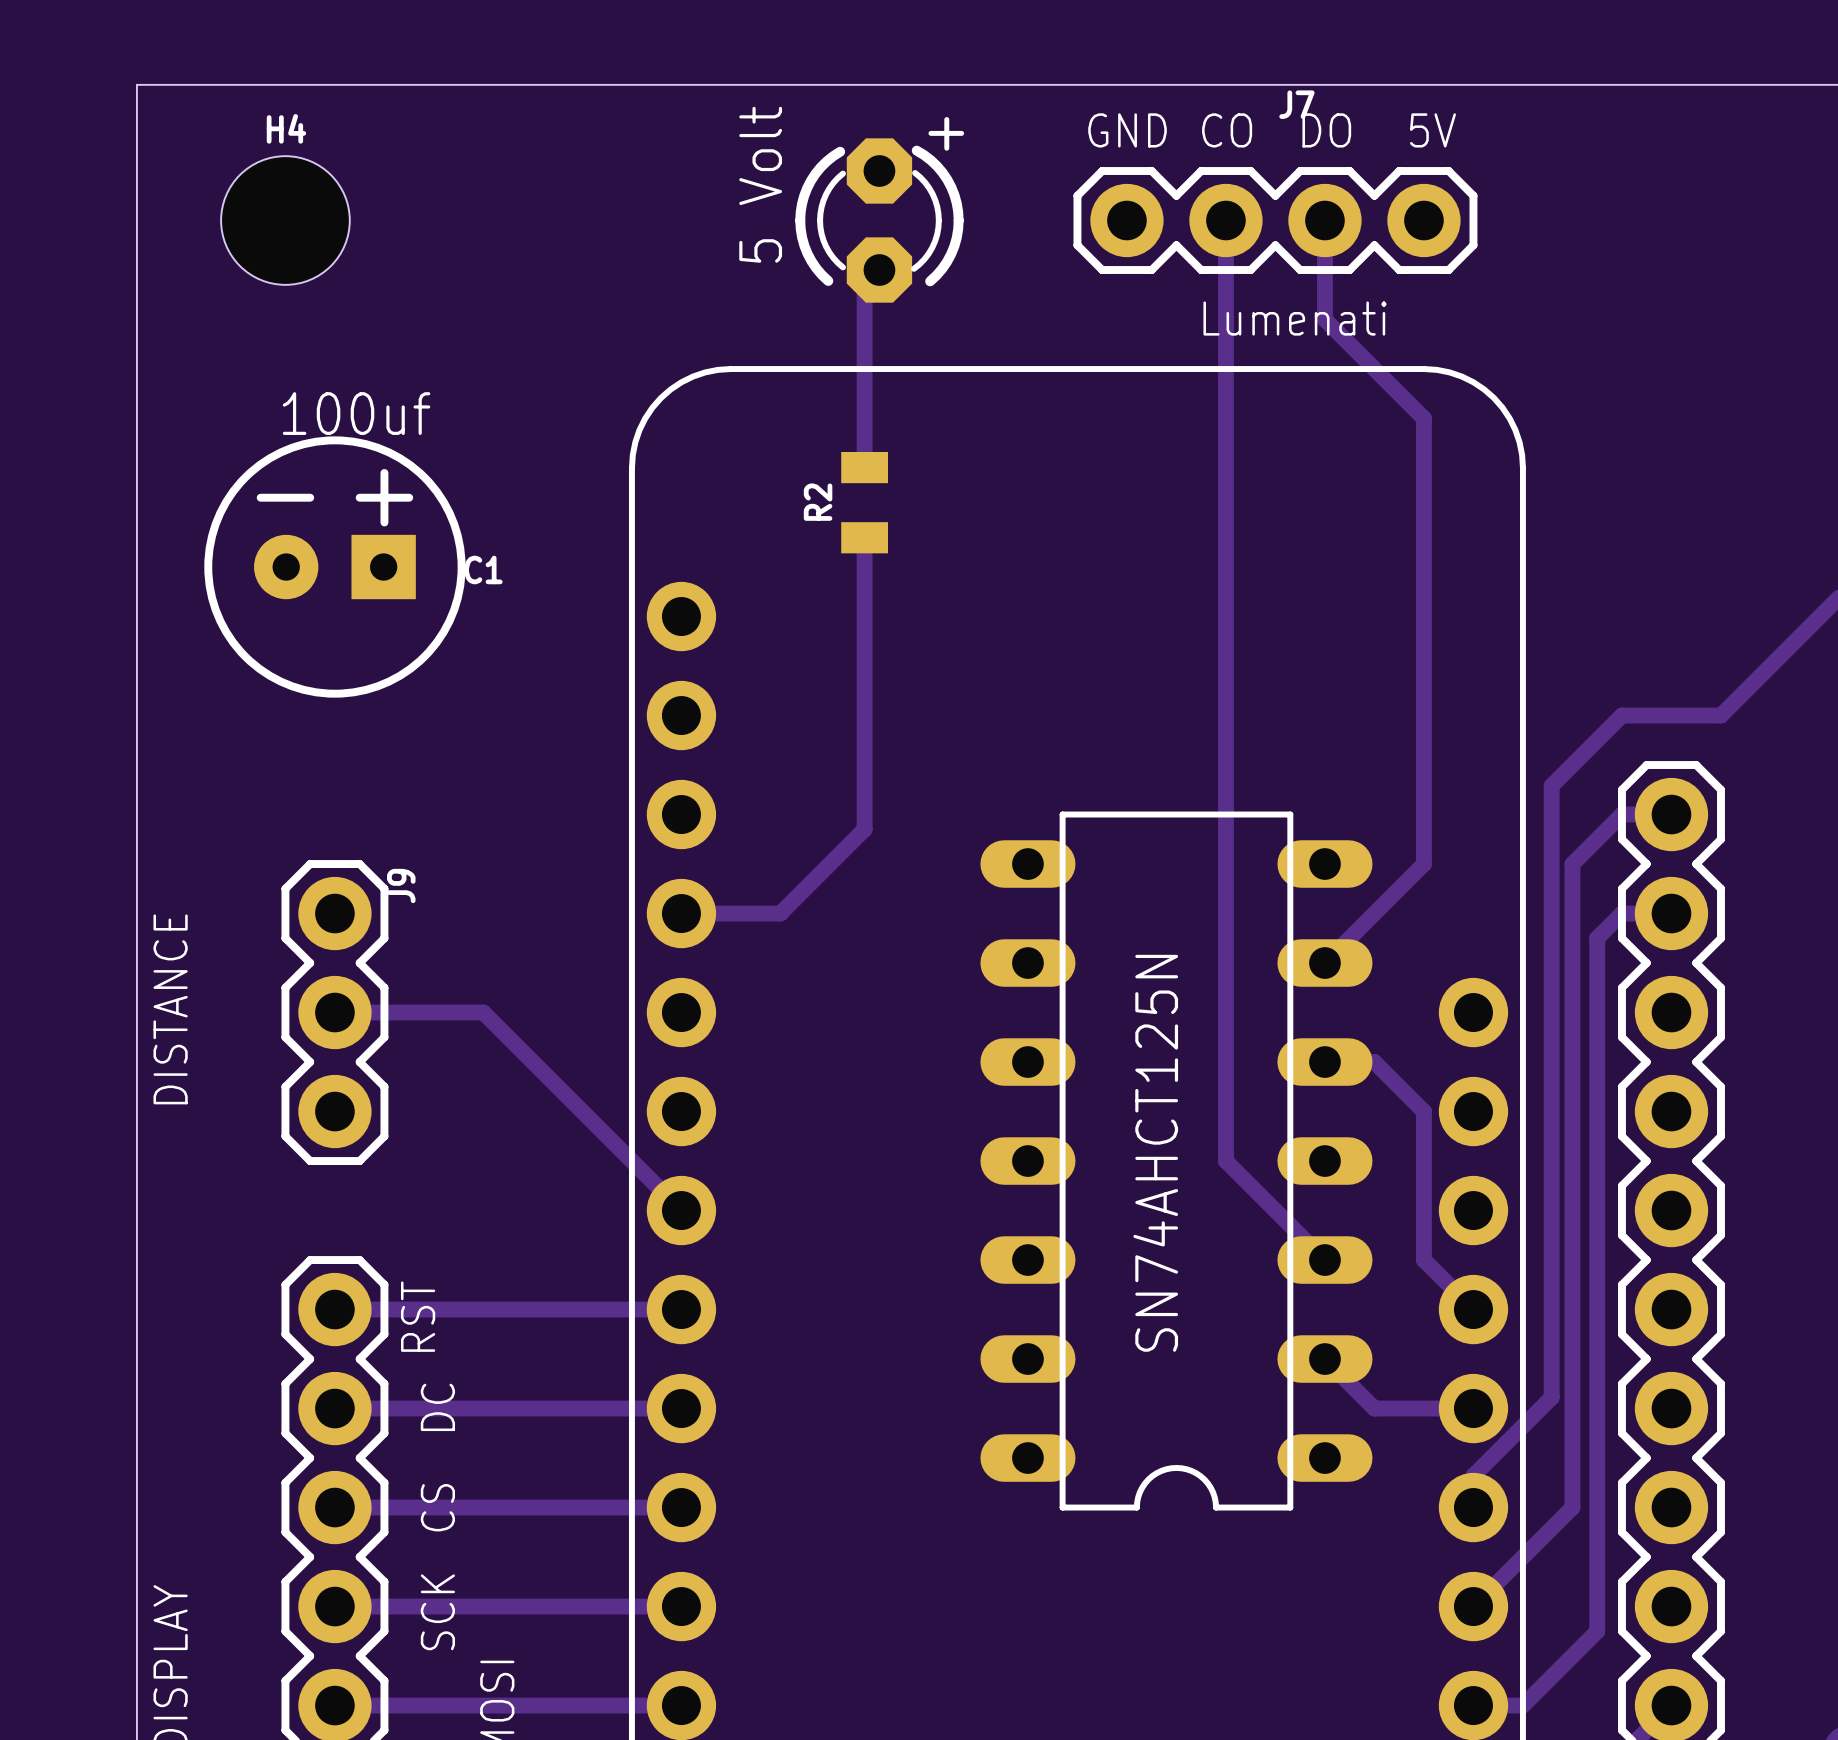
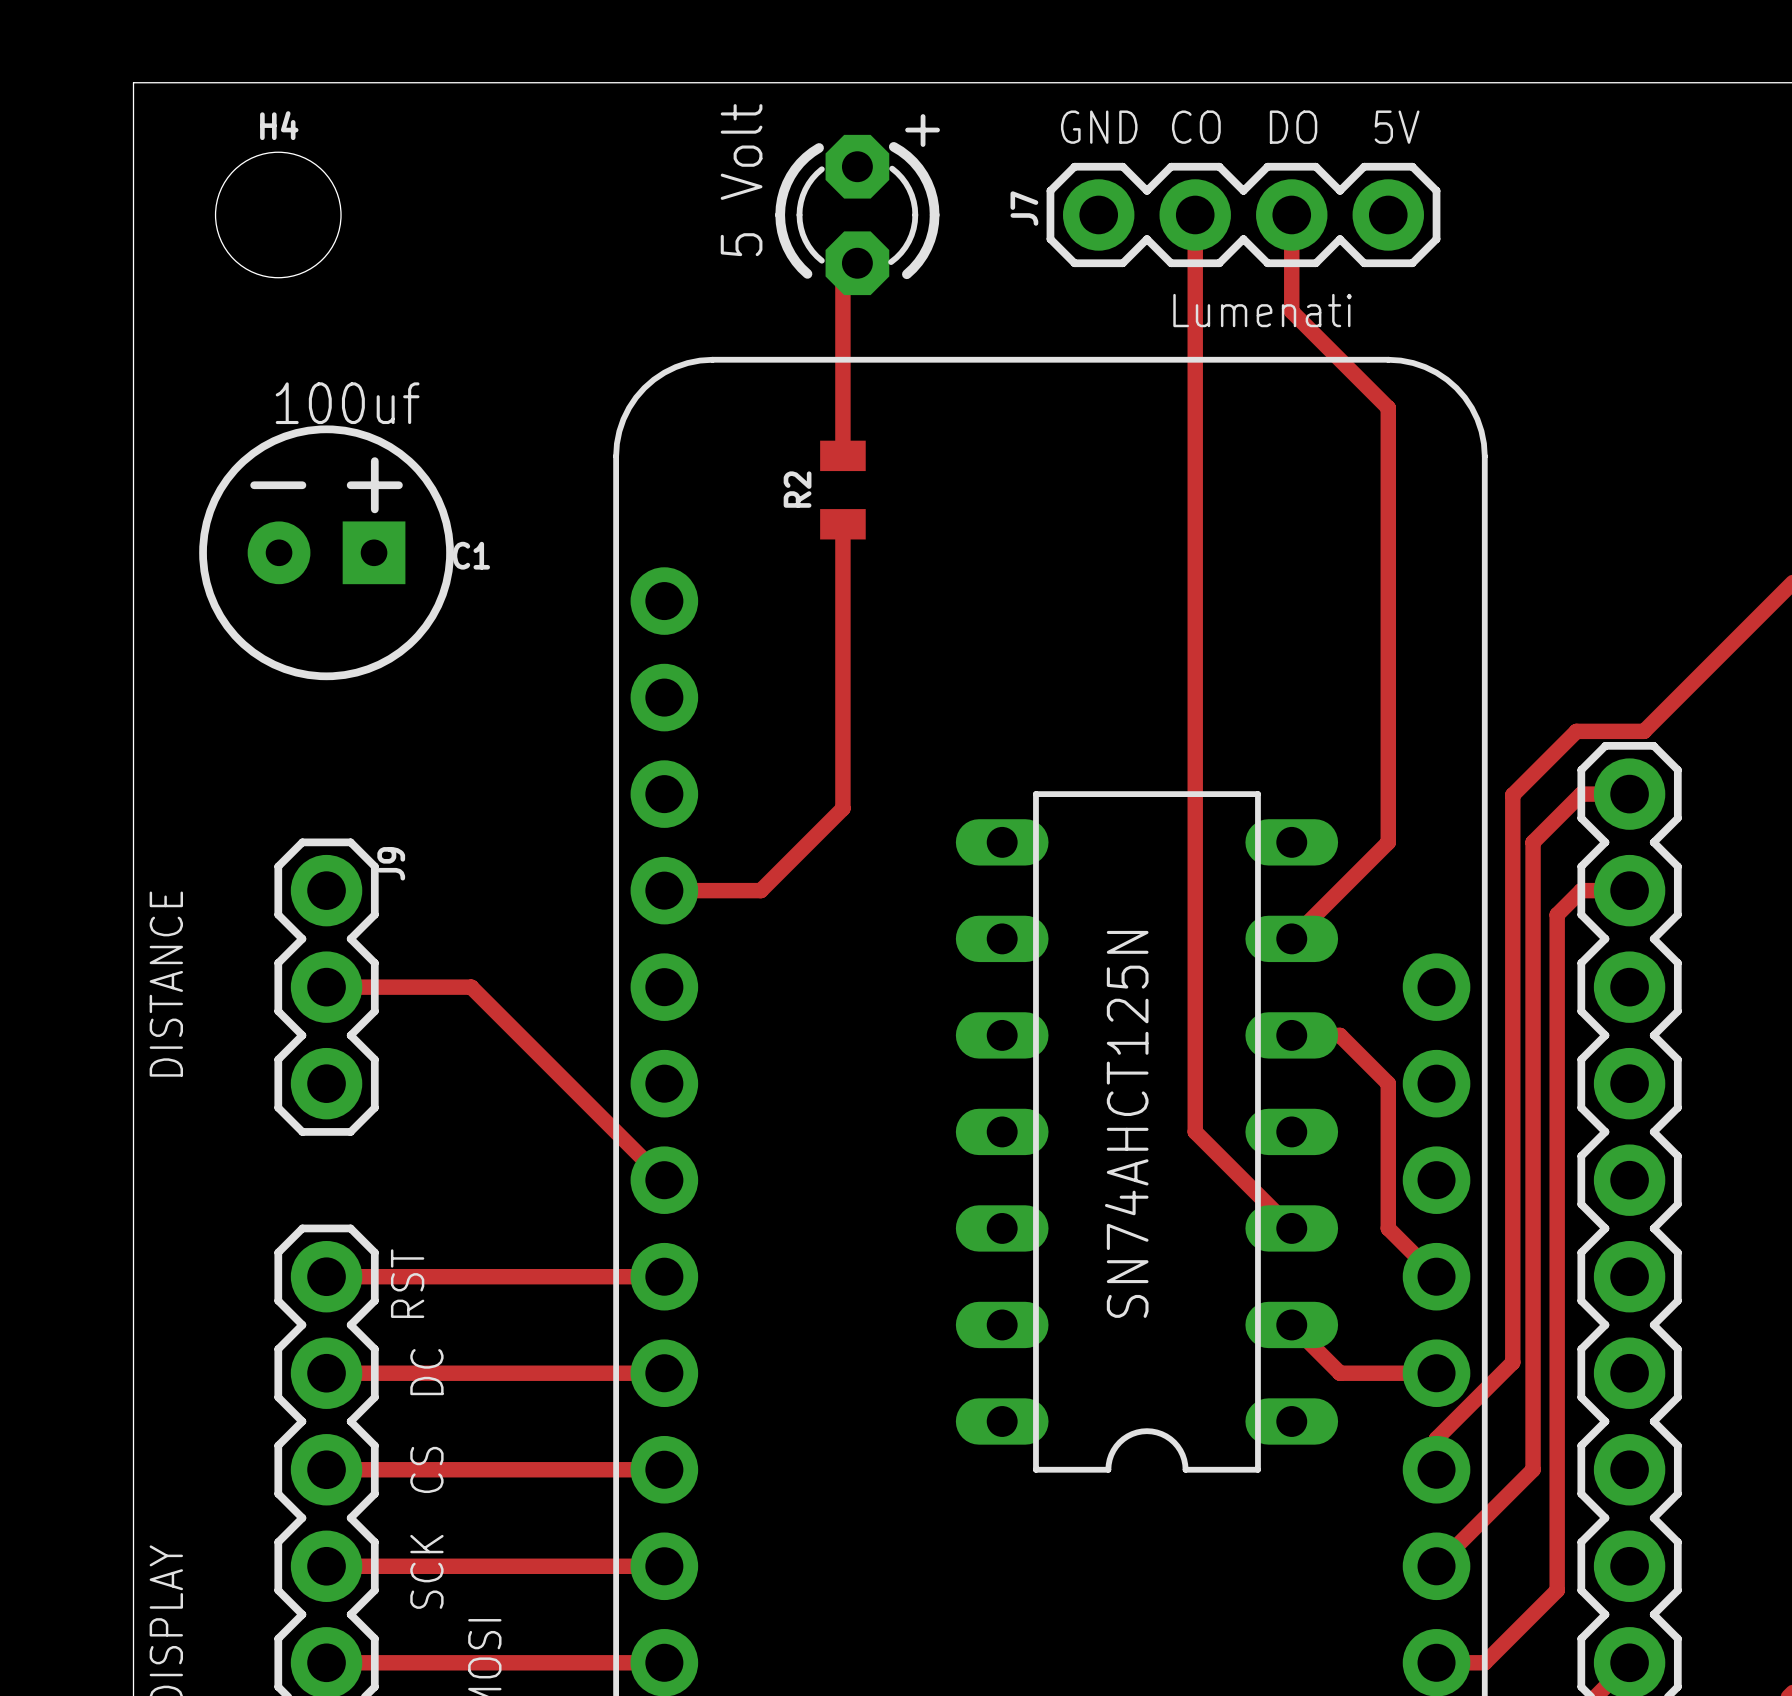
J7 name rotation: 0° (1296, 104) -> 90° counterclockwise (1024, 208)
J7 name position: J7 (1296, 104) -> J7 (1024, 208)
track: (1720, 715) (1621, 715) (1551, 785) (1551, 815) -> (1677, 697) (1644, 731) (1576, 731) (1512, 795)

